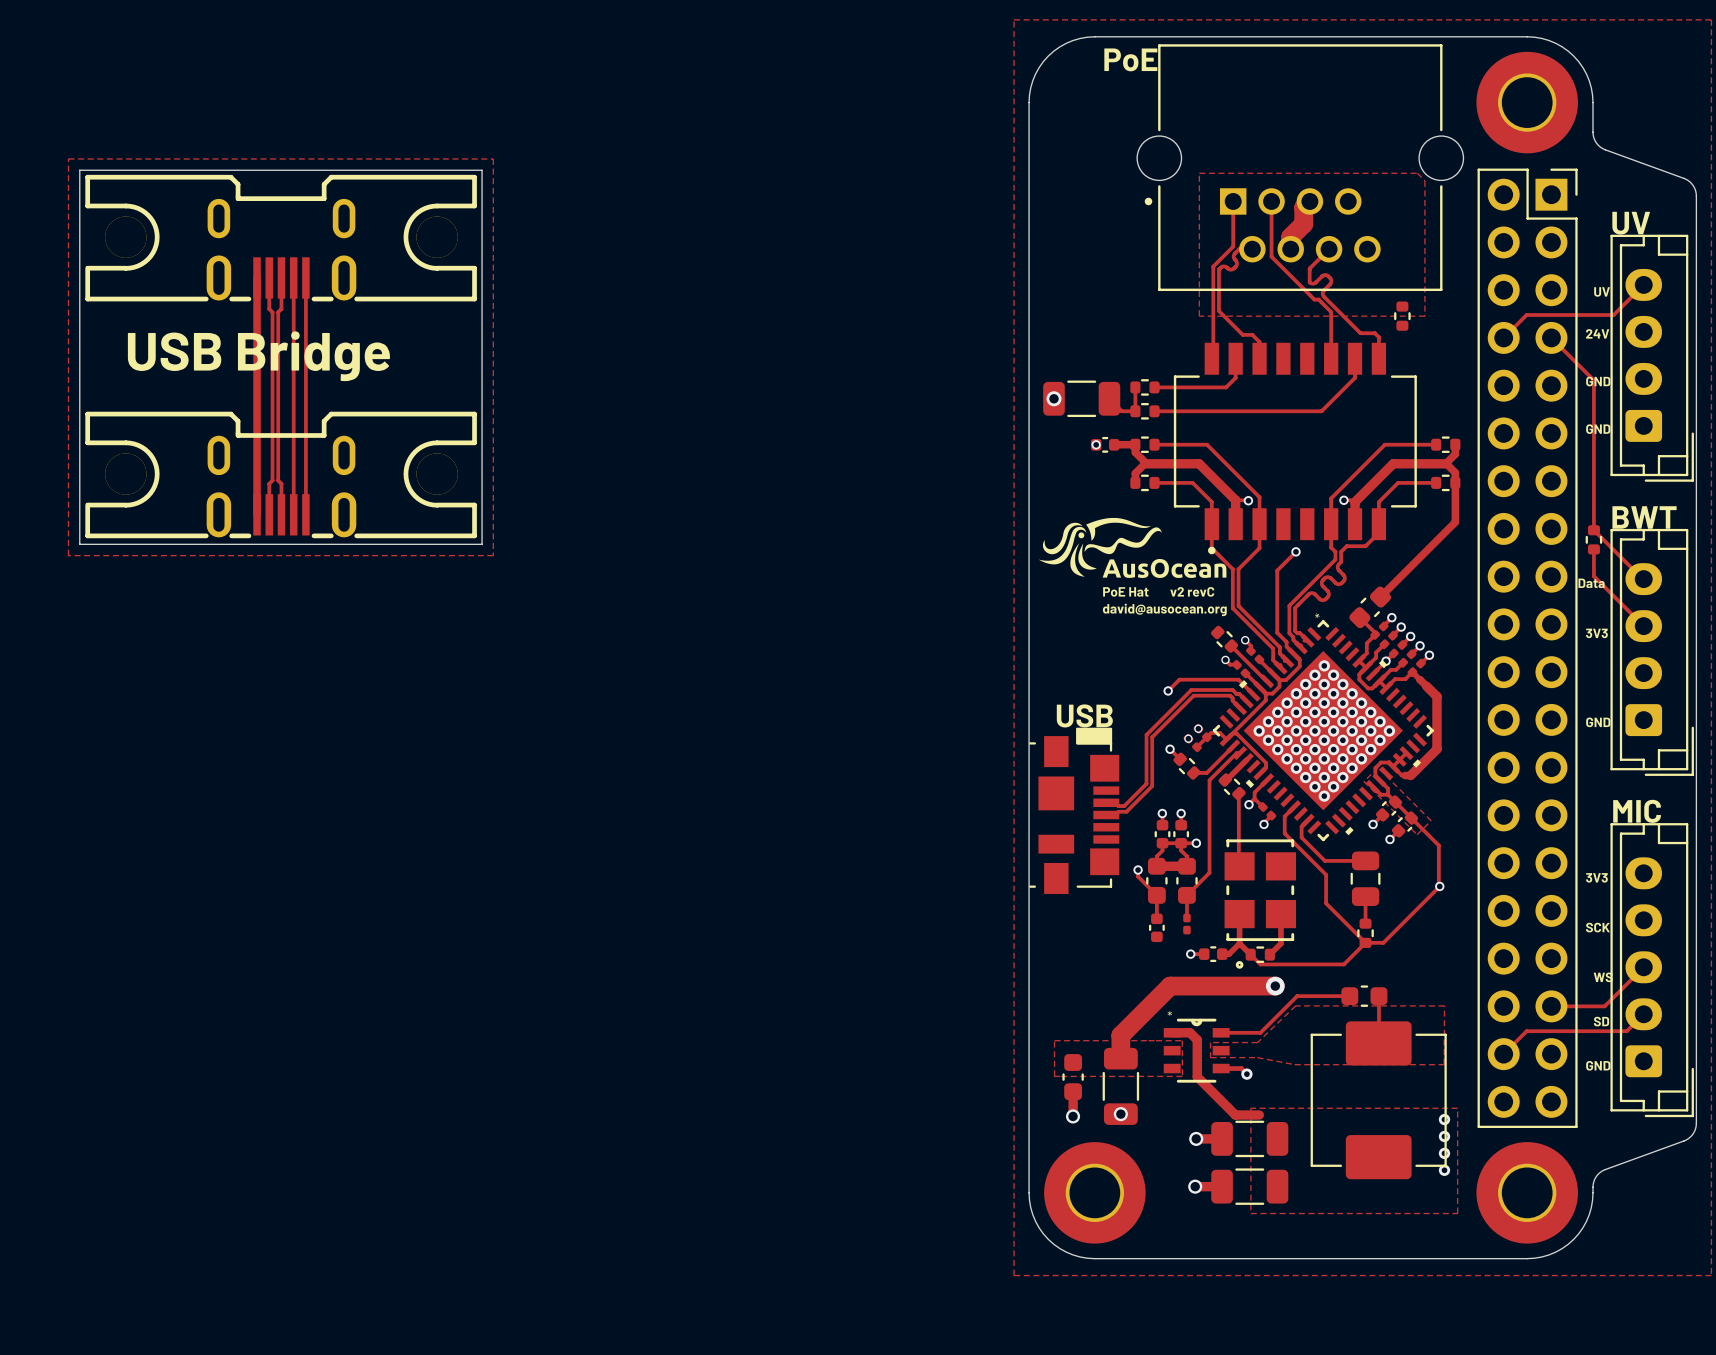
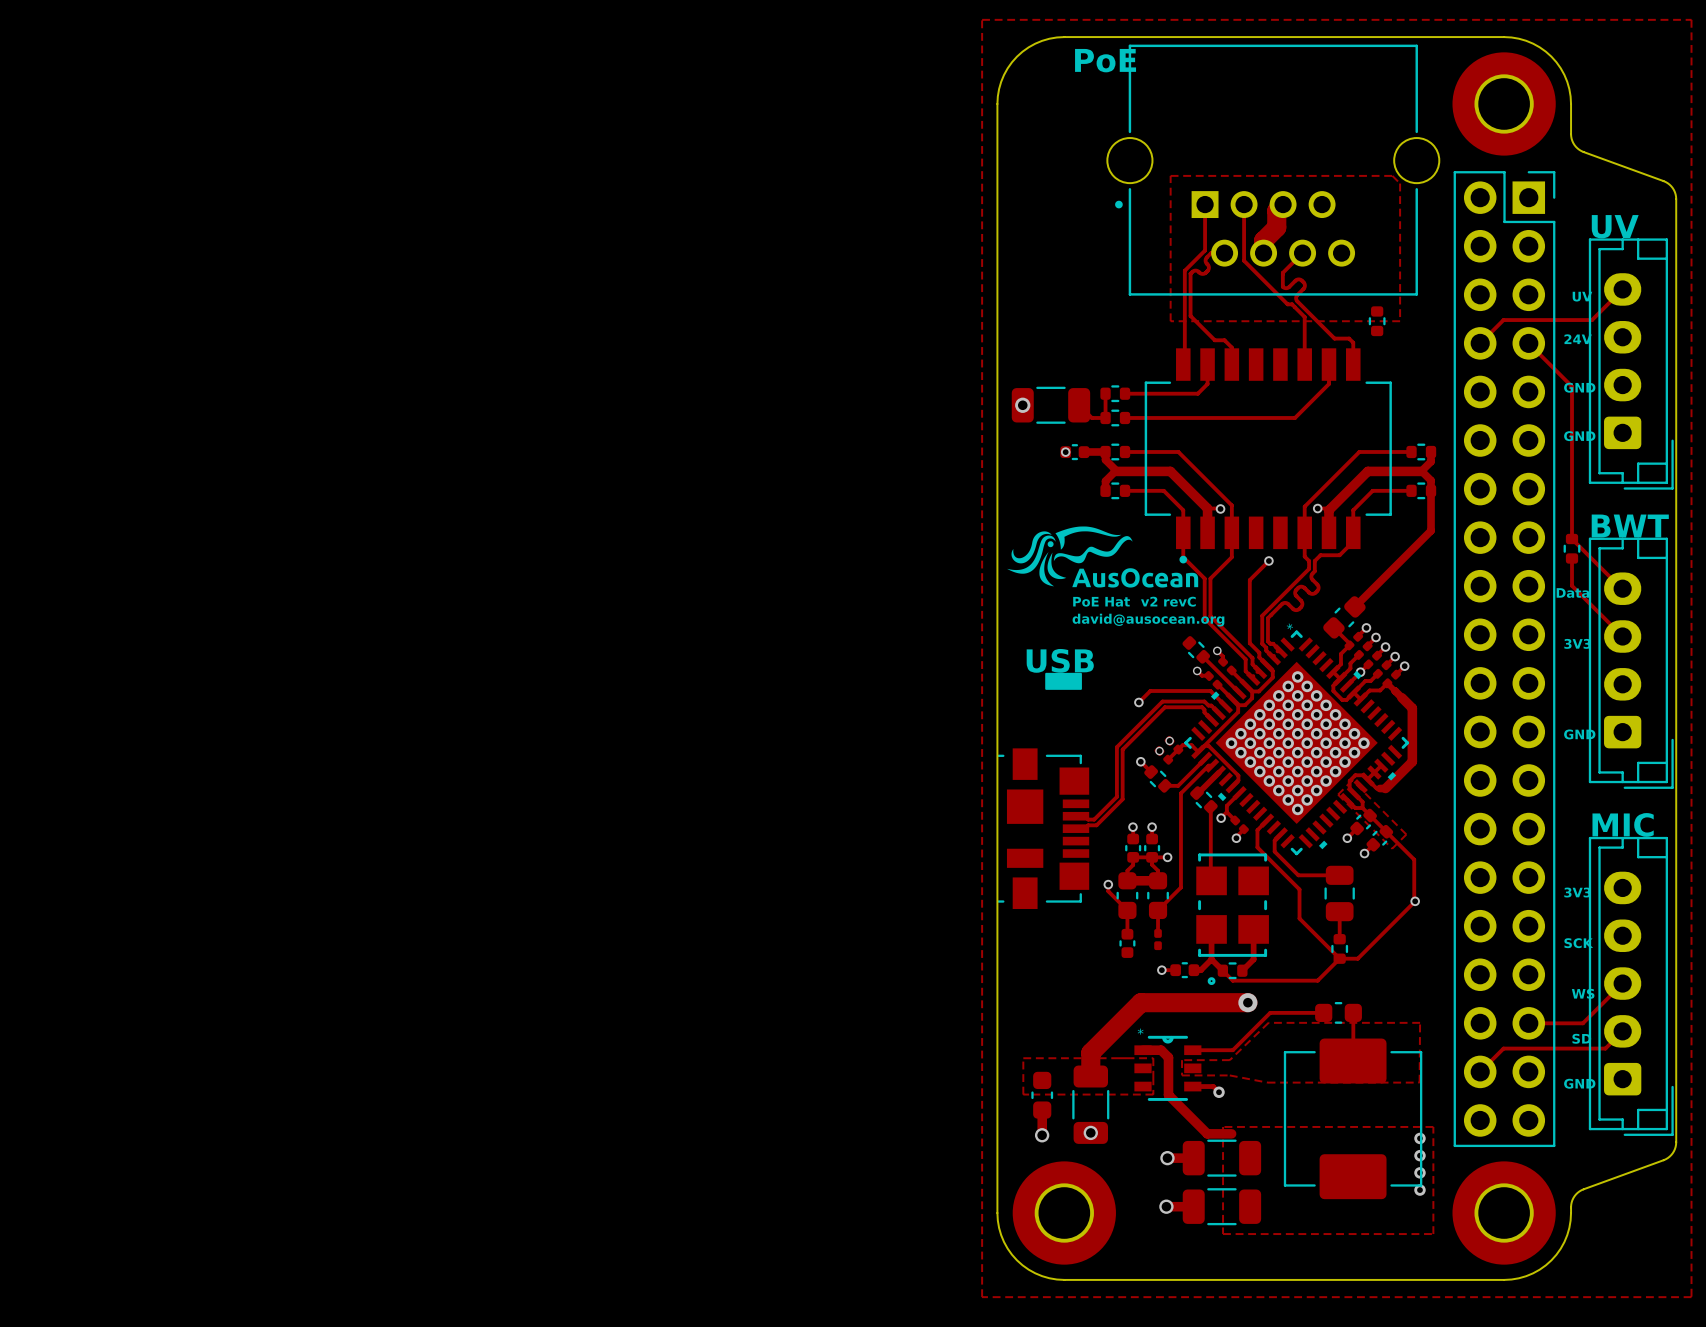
zone outline: (68, 158) (493, 158) (493, 555) (68, 555) (68, 158) -> none
board edge: (79, 170) (482, 170) (482, 544) (79, 544) (79, 170) -> none
part: (281, 238) -> none
track: (257, 277) (257, 514) -> none
track: (269, 277) (269, 308) (272, 312) (272, 480) (269, 483) (269, 514) -> none
track: (281, 277) (281, 308) (278, 312) (278, 480) (281, 483) (281, 514) -> none
track: (293, 277) (293, 514) -> none
track: (305, 277) (305, 514) -> none
text: USB Bridge (258, 356) -> none
part: (281, 474) -> none
text position: USB (1084, 715) -> USB (1060, 660)
drawing position: (1094, 736) -> (1063, 681)

